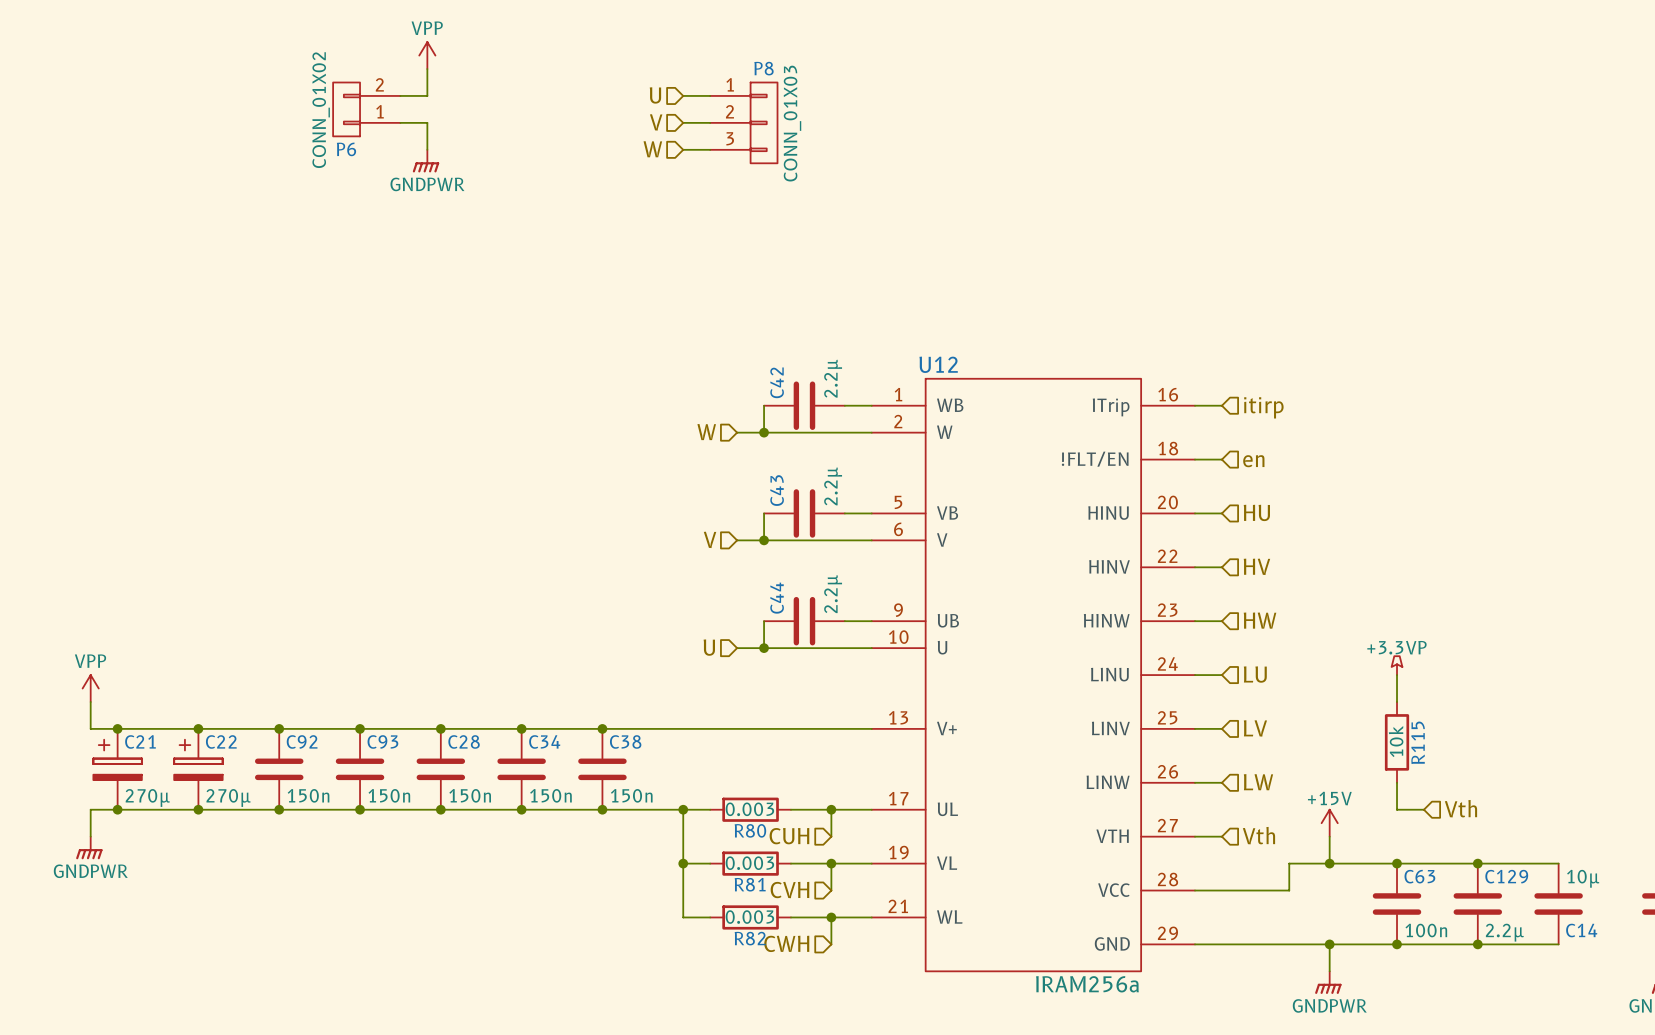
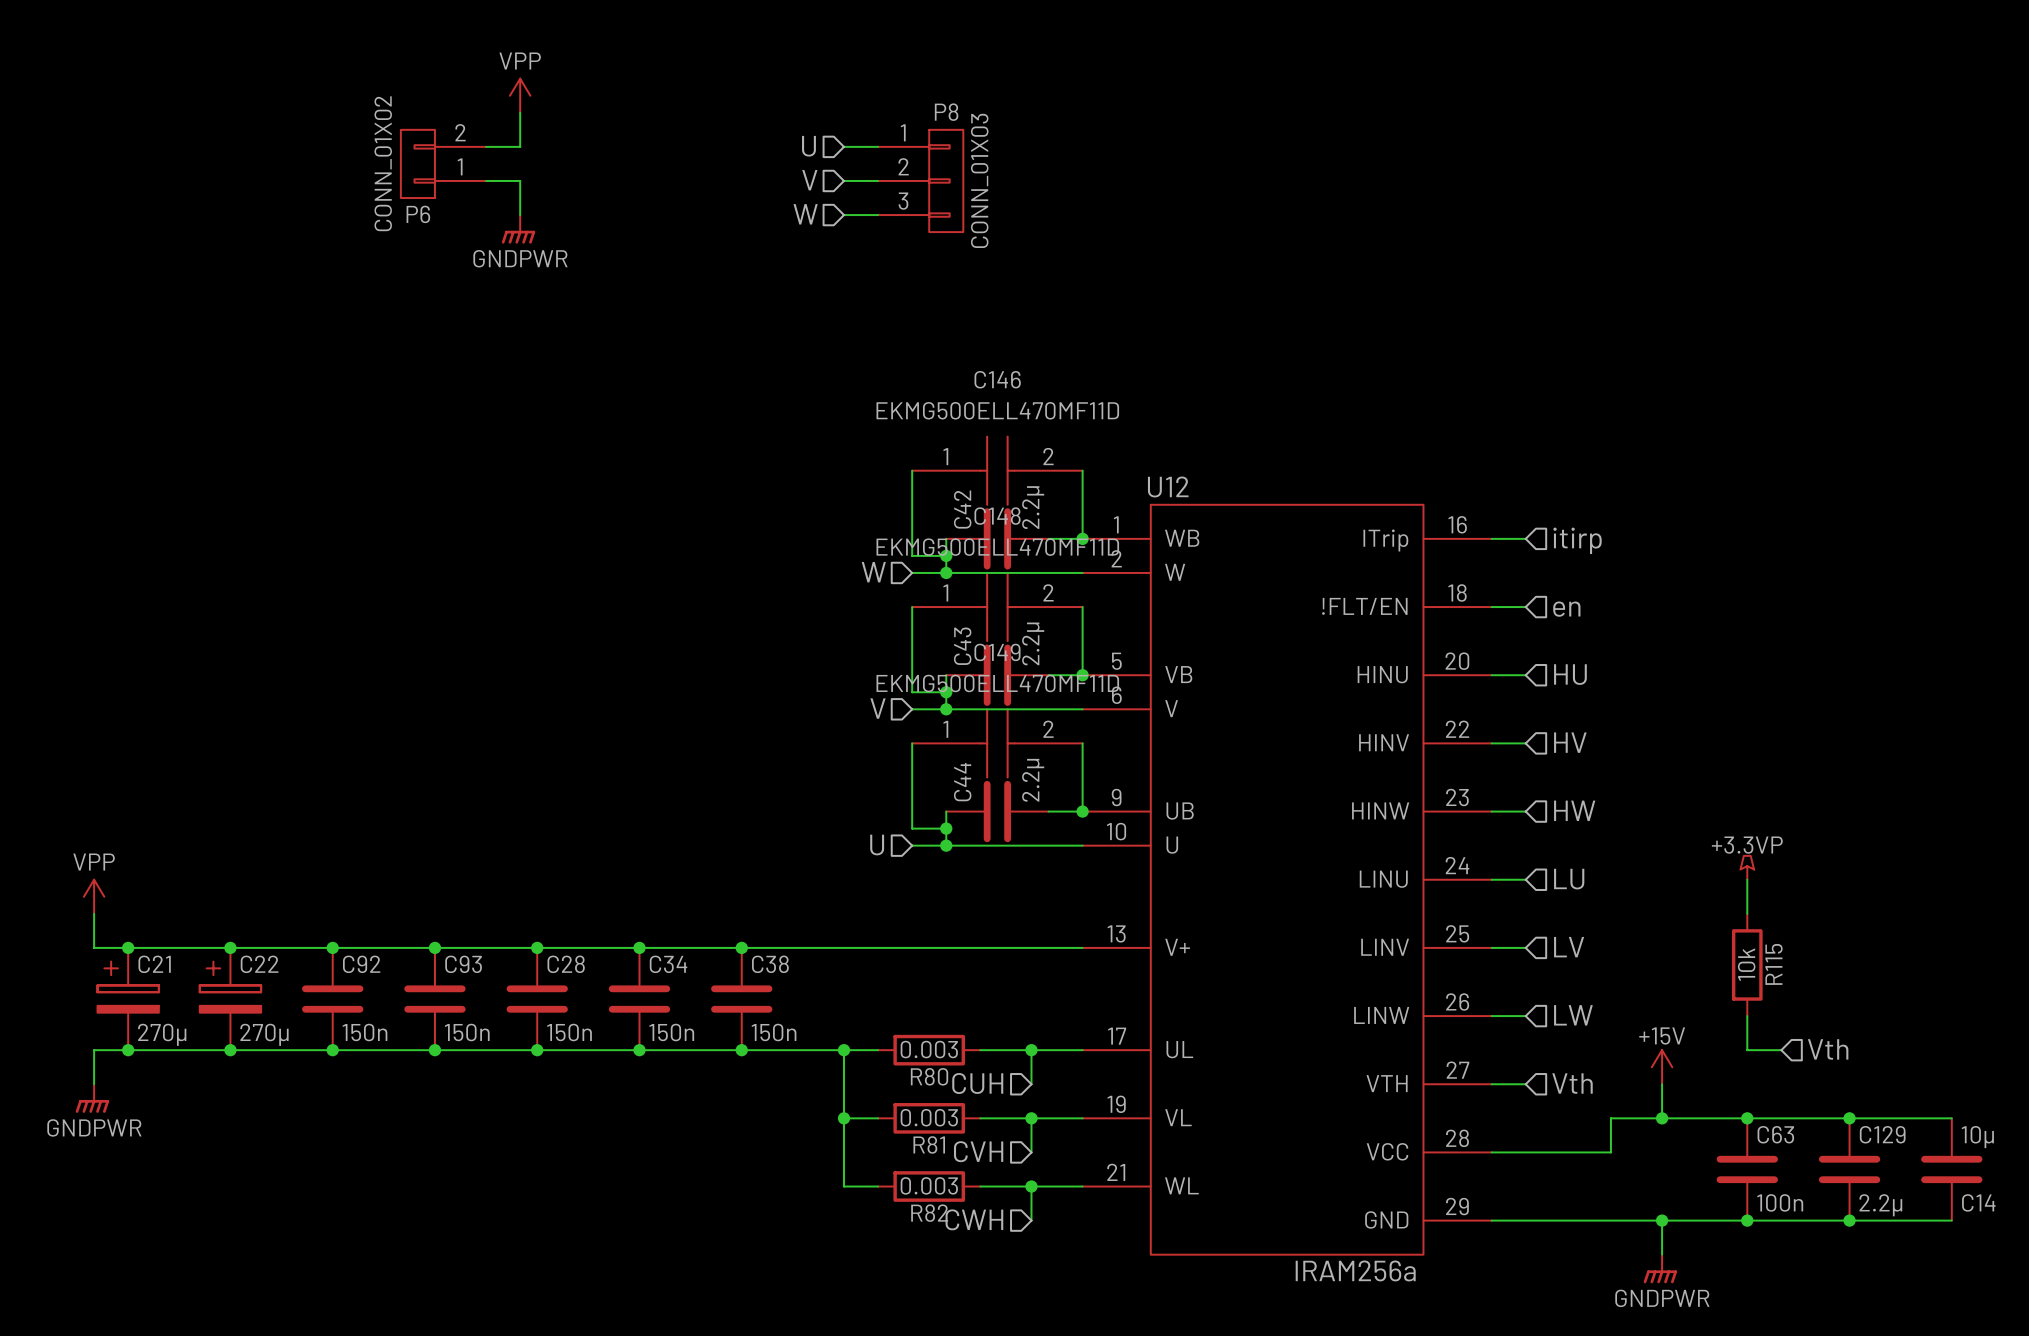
wire: none -> (912, 470) (912, 555) (946, 555)
C146: none -> EKMG500ELL470MF11D (997, 470)
wire: none -> (1082, 470) (1082, 538)
junction: none -> (1082, 538)
junction: none -> (946, 555)
wire: none -> (912, 607) (912, 692) (946, 692)
C148: none -> EKMG500ELL470MF11D (997, 607)
wire: none -> (1082, 607) (1082, 675)
junction: none -> (1082, 675)
junction: none -> (946, 692)
wire: none -> (912, 743) (912, 828) (946, 828)
C149: none -> EKMG500ELL470MF11D (997, 743)
wire: none -> (1082, 743) (1082, 811)
junction: none -> (1082, 811)
junction: none -> (946, 828)

